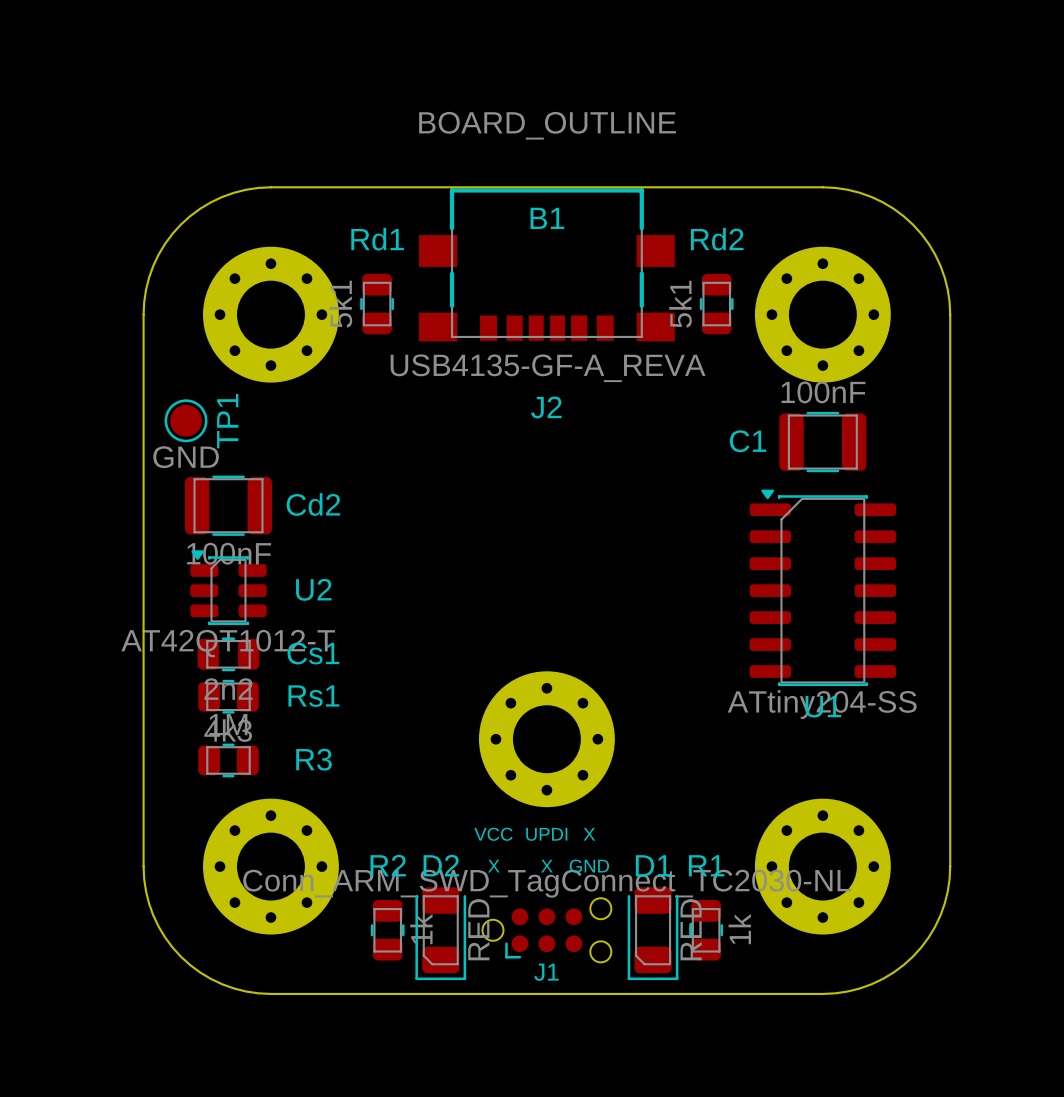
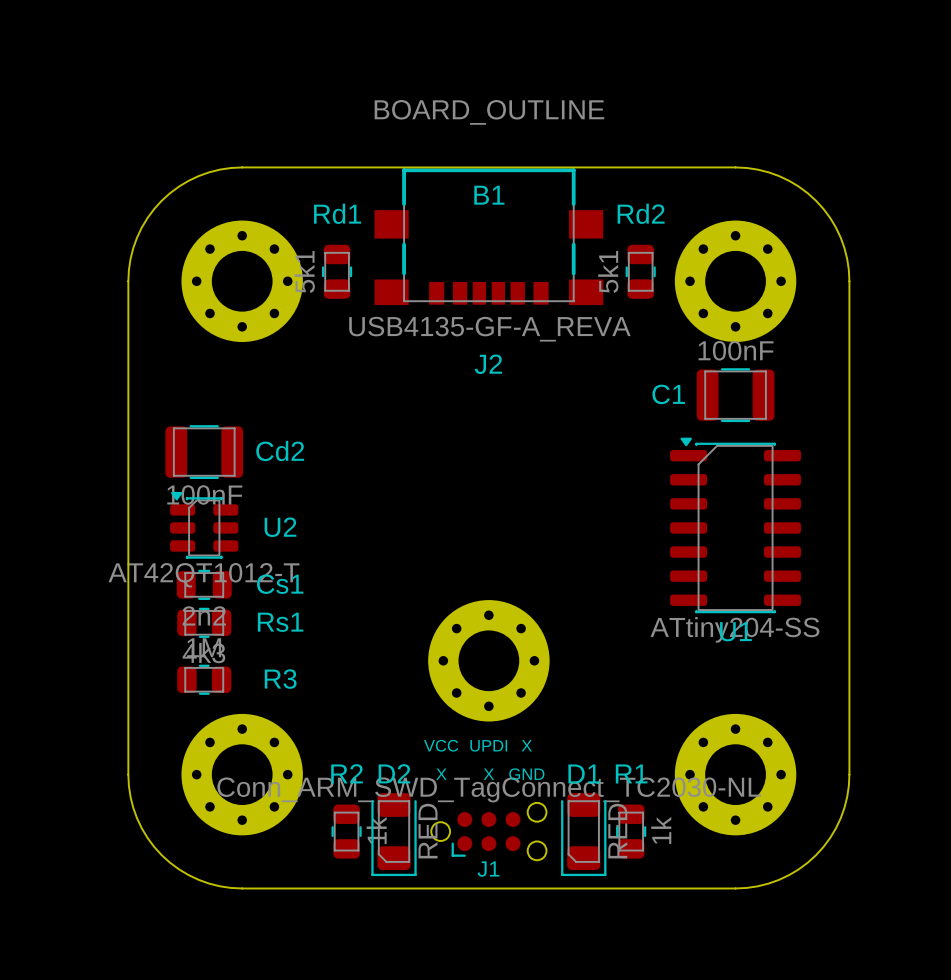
TP1: GND (186, 420) -> none

